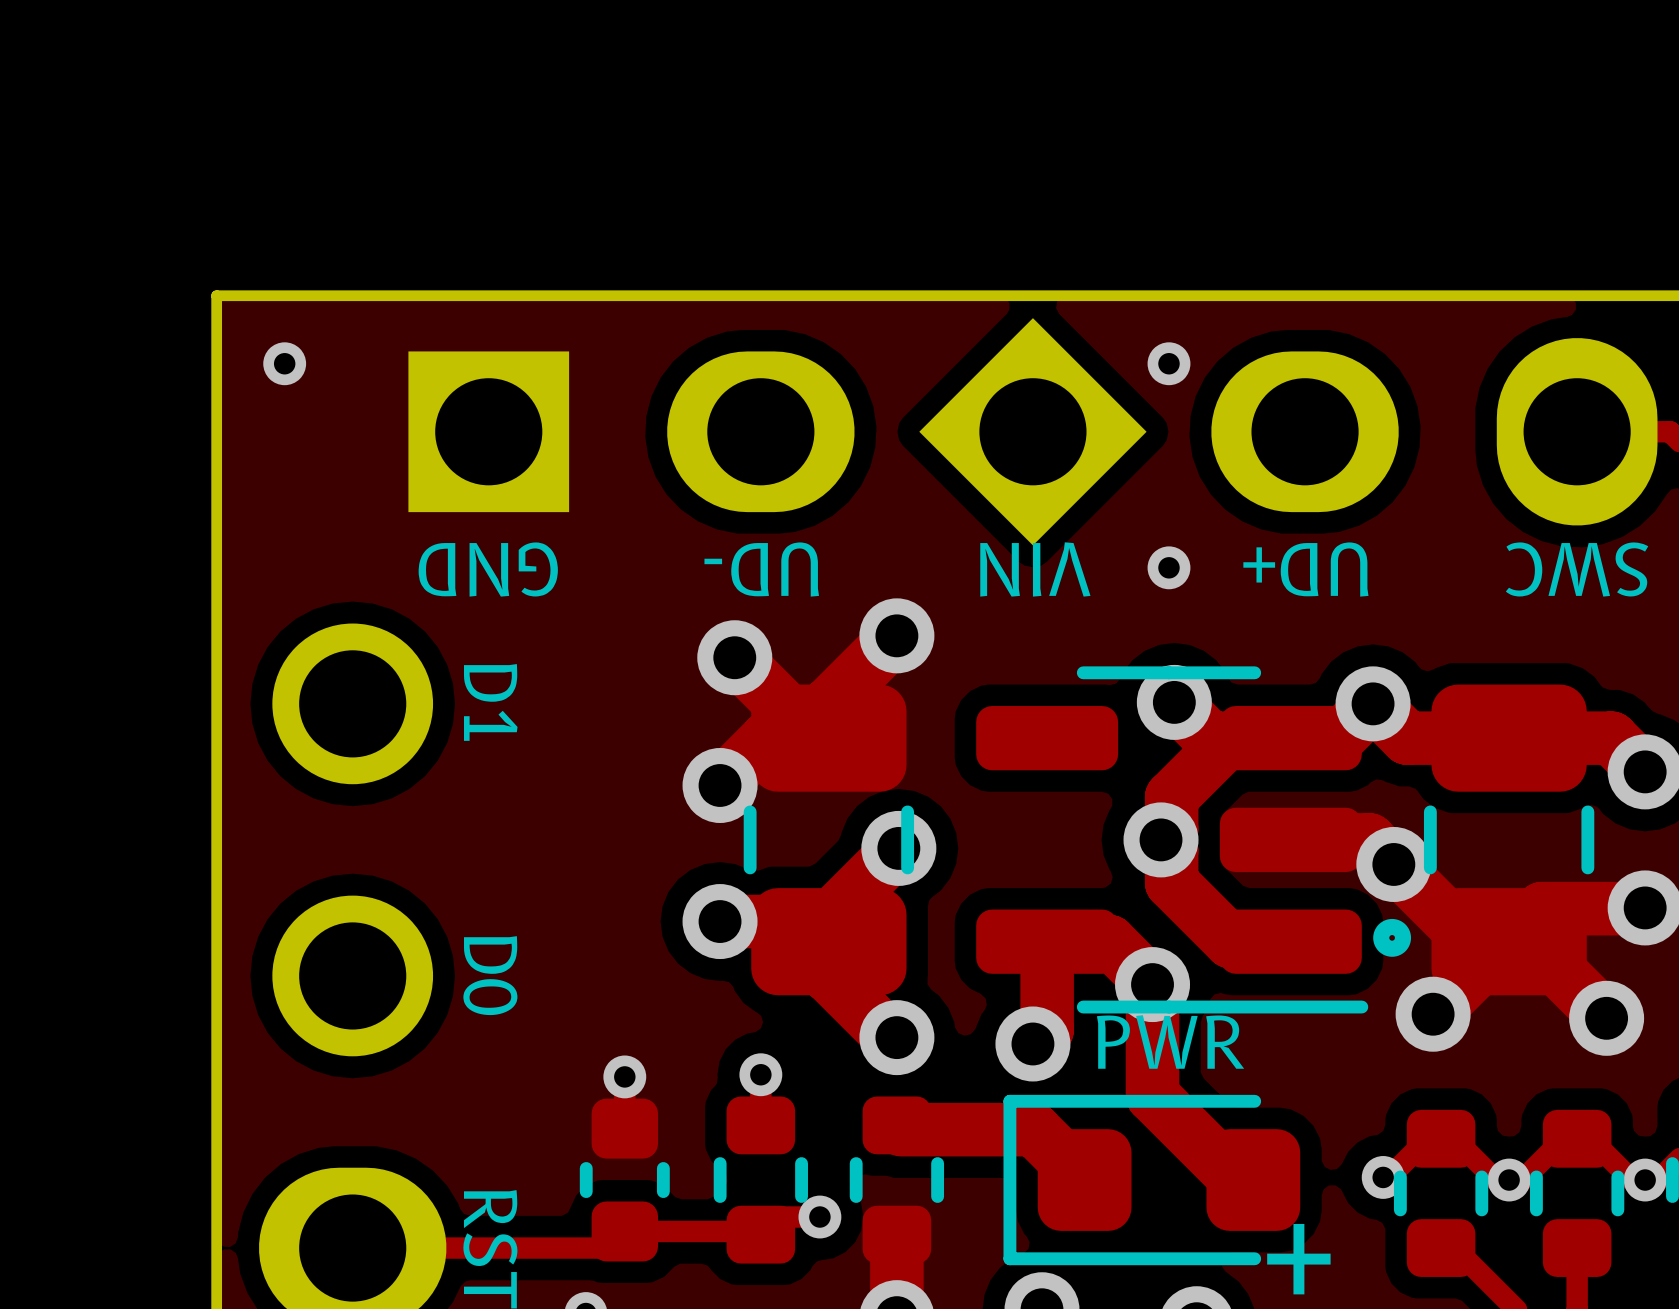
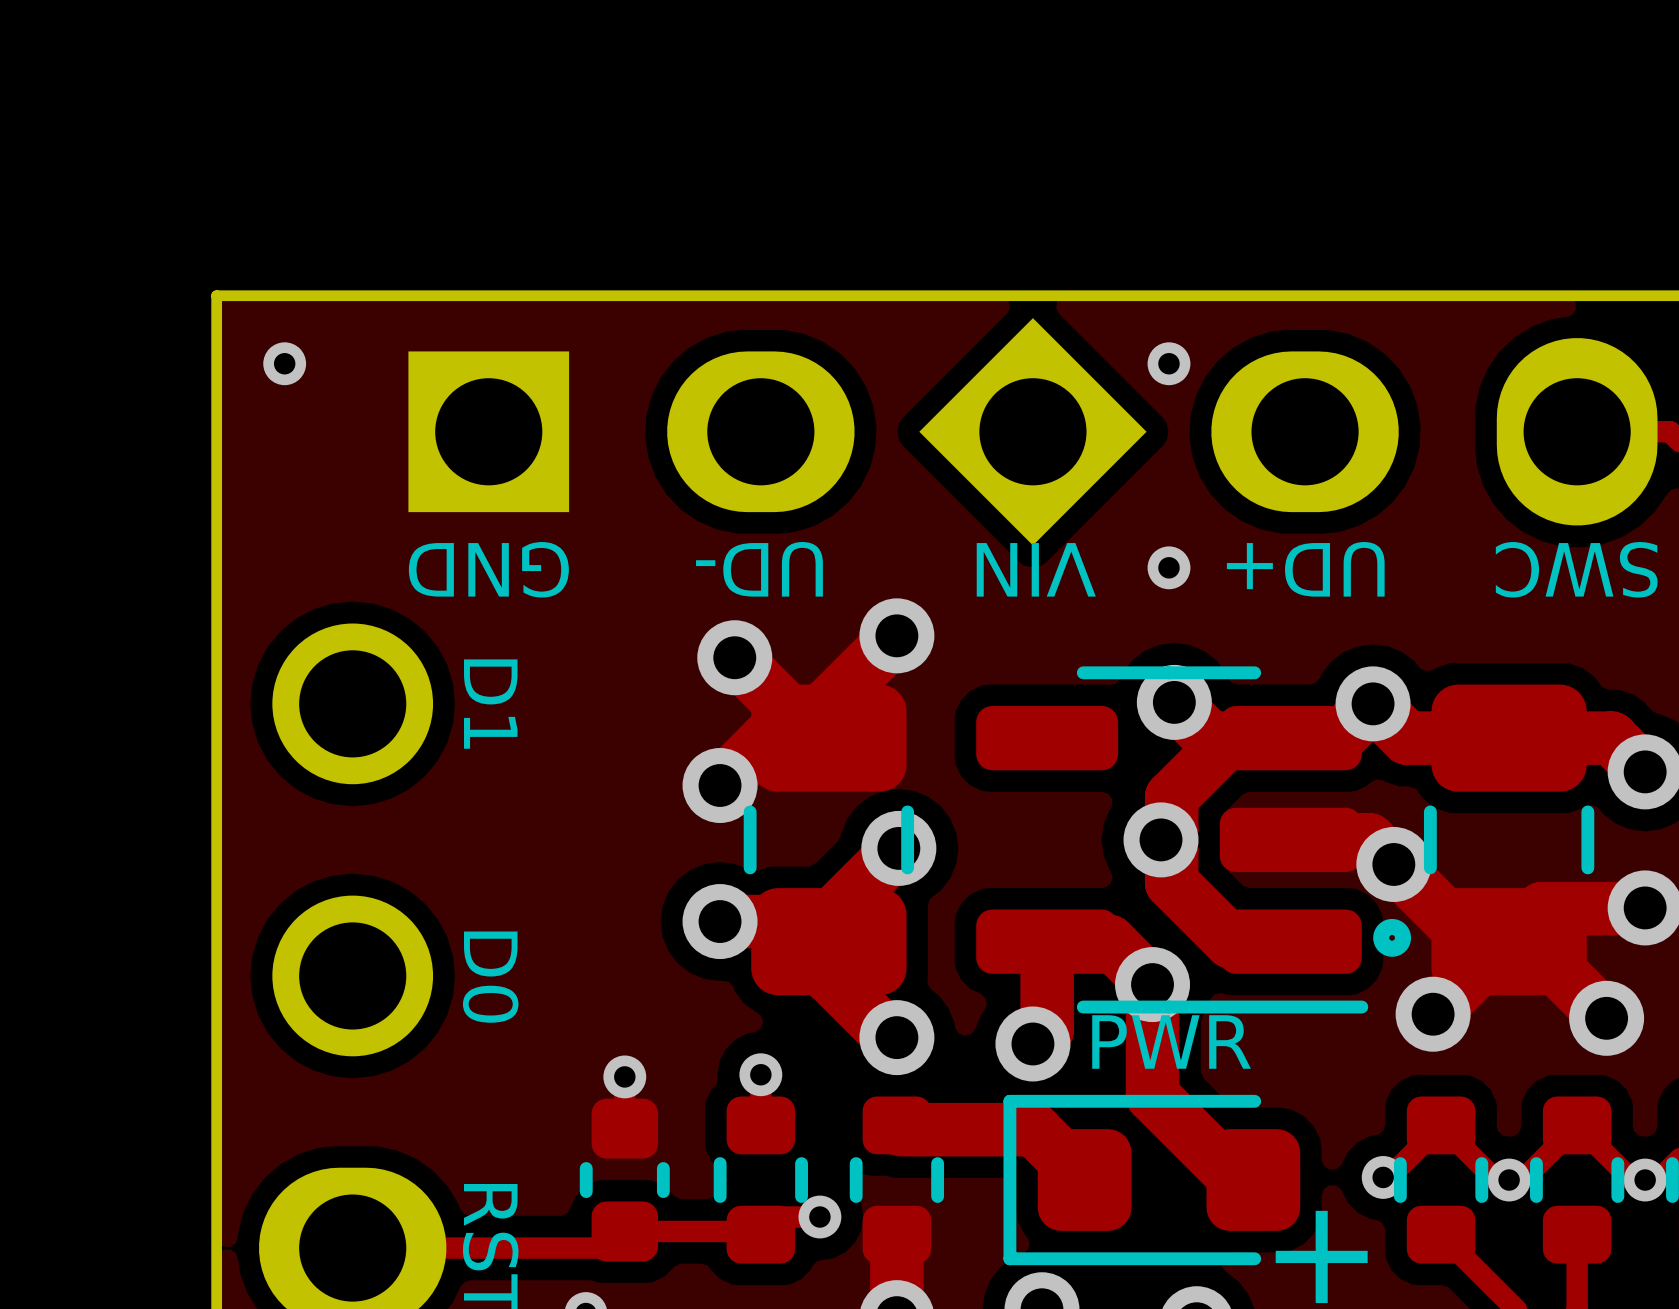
part position: (1441, 1193) -> (1441, 1180)
part position: (1577, 1193) -> (1577, 1180)

